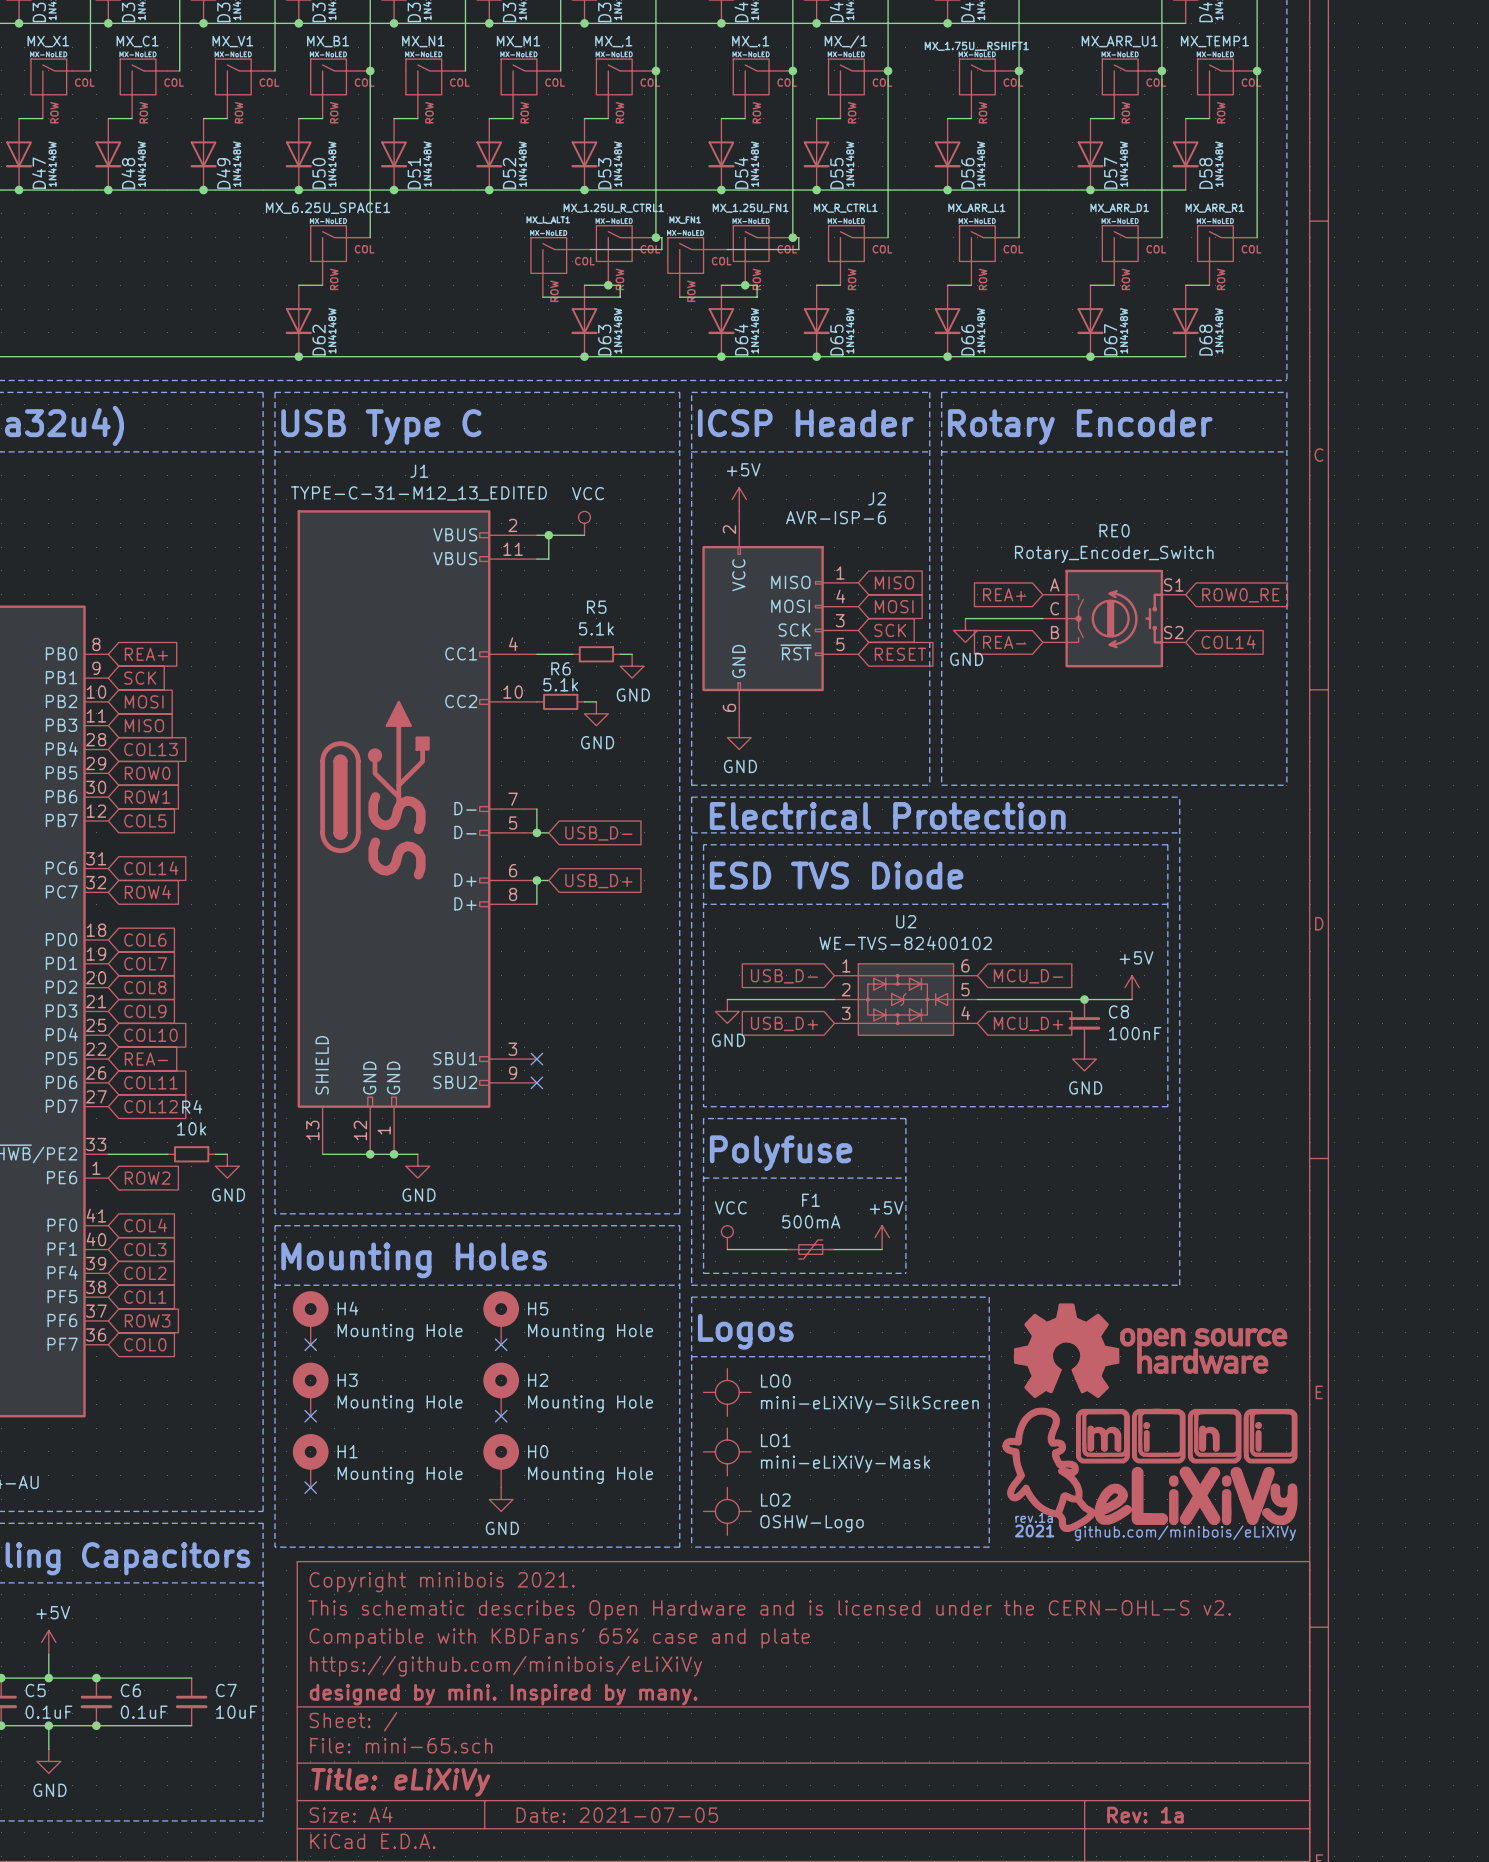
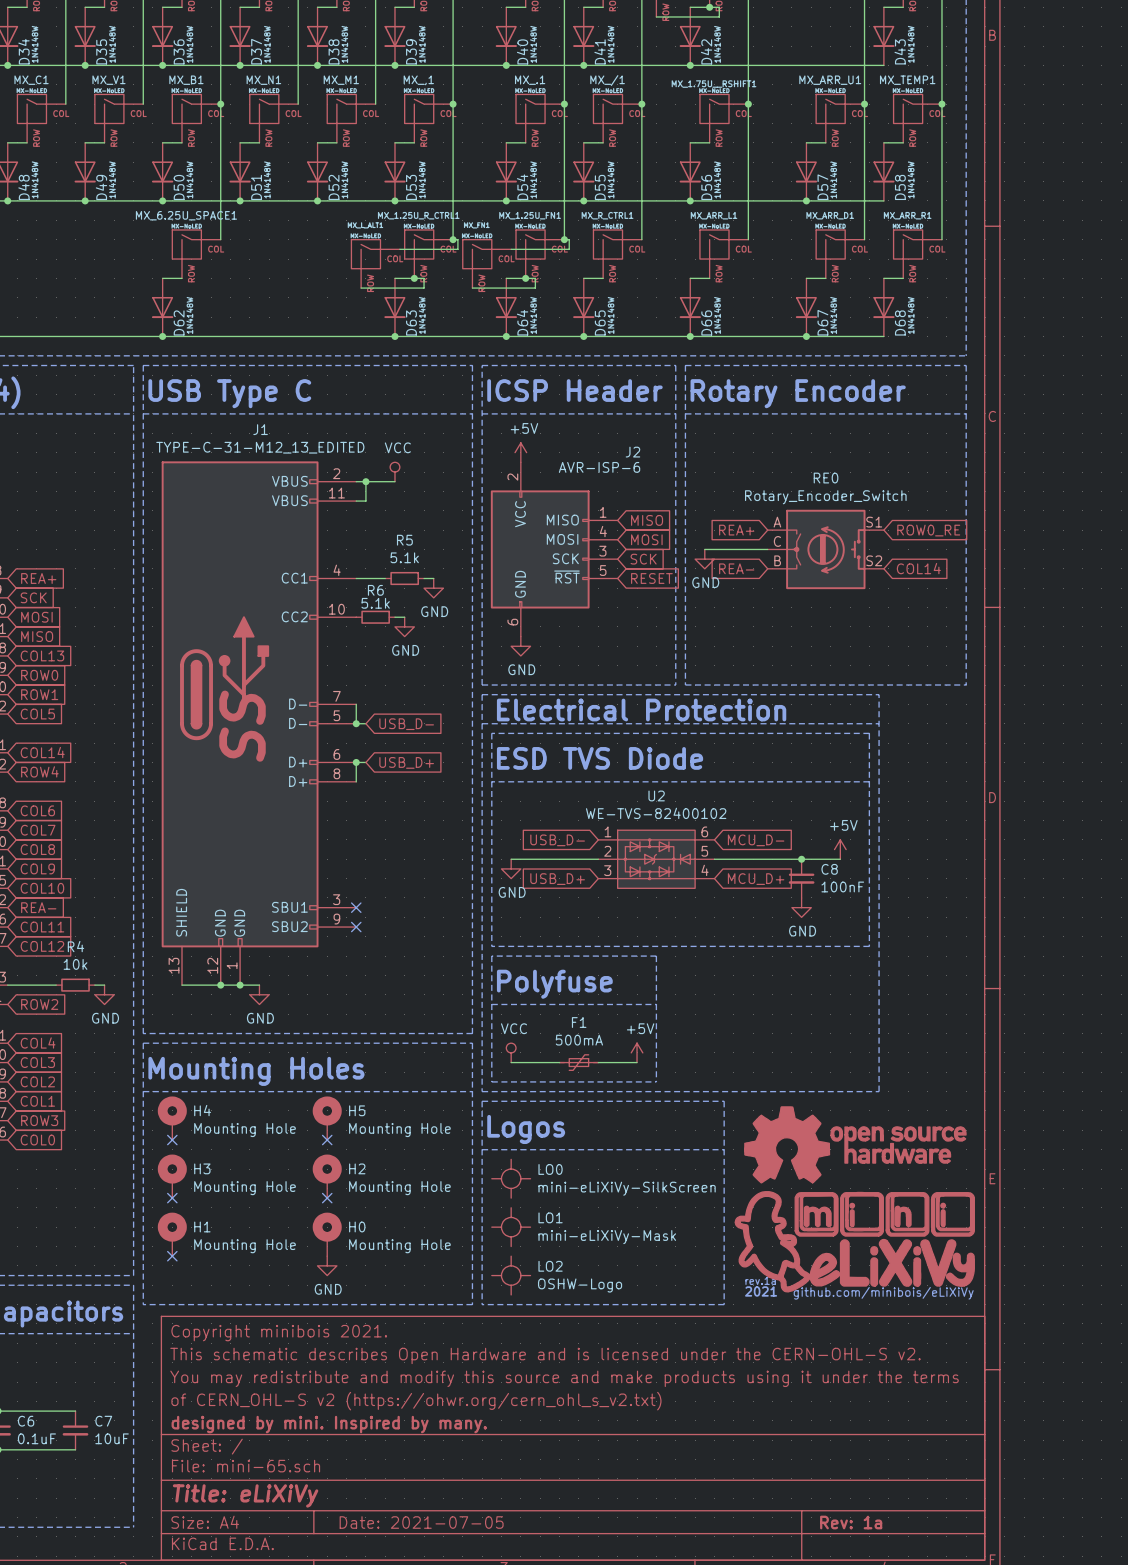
title block: Compatible with KBDFans' 65% case and plate (559, 1638) -> You may redistribute and modify this source and make products using it under the terms (564, 1378)
title block: https://github.com/minibois/eLiXiVy (506, 1666) -> of CERN_OHL-S v2 (https://ohwr.org/cern_ohl_s_v2.txt) (416, 1401)

